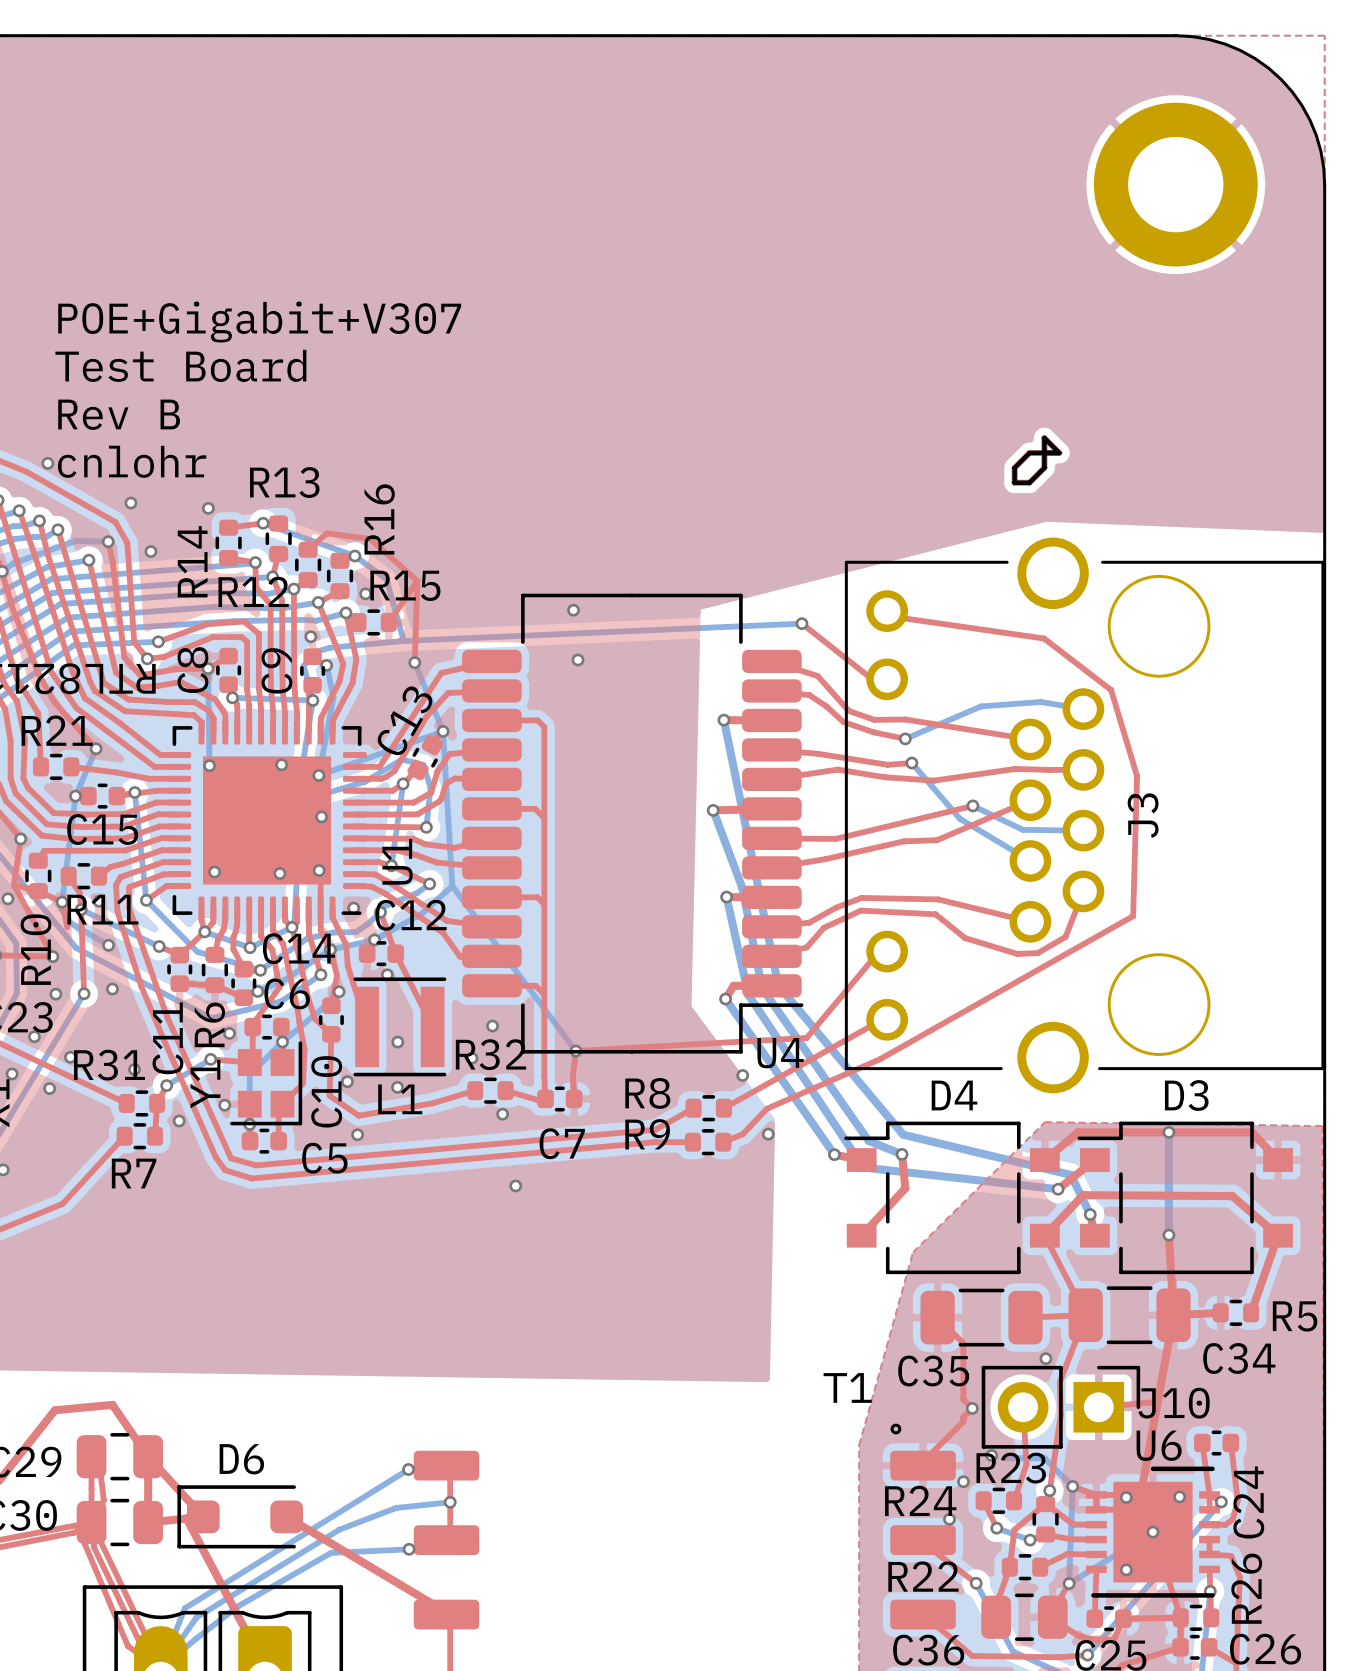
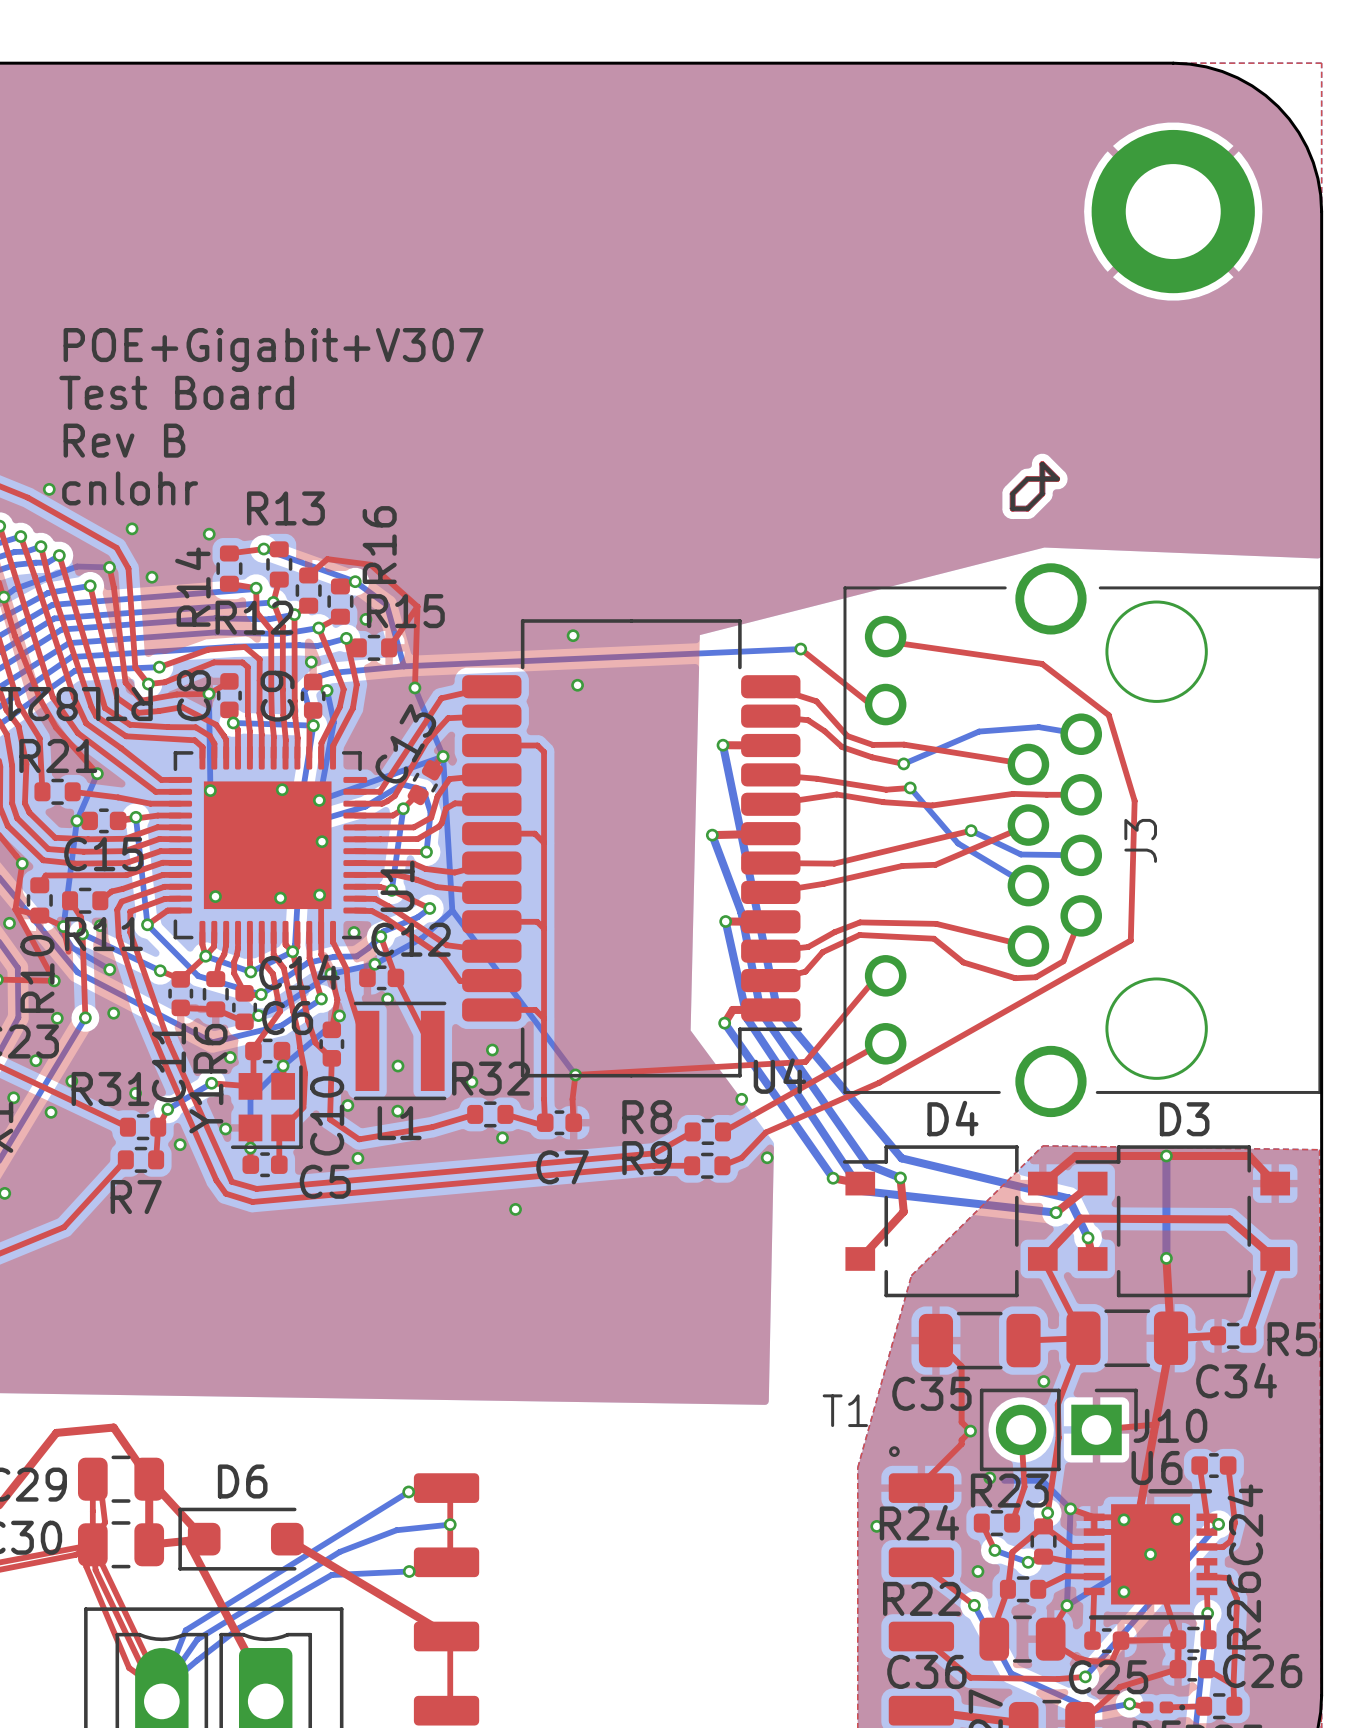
via: (963, 1481) -> none
via: none -> (876, 1526)
via: (949, 1519) -> none
via: none -> (977, 1571)

